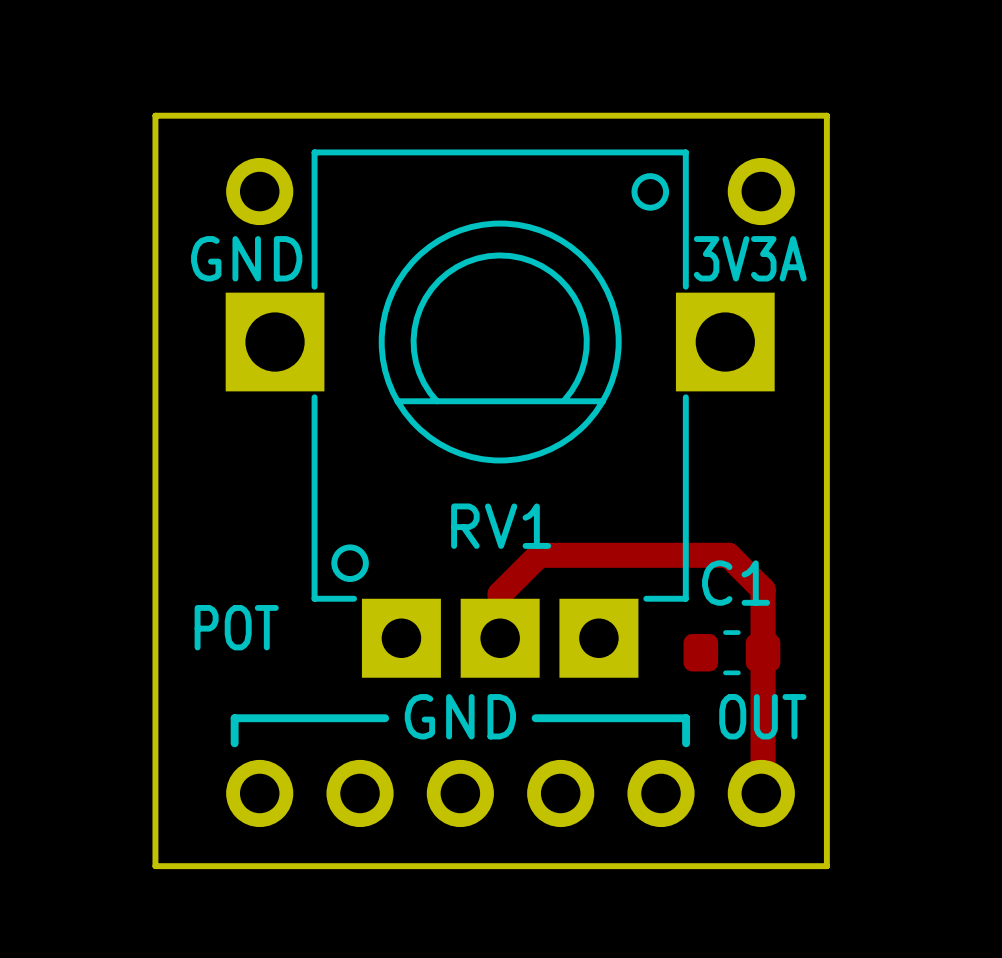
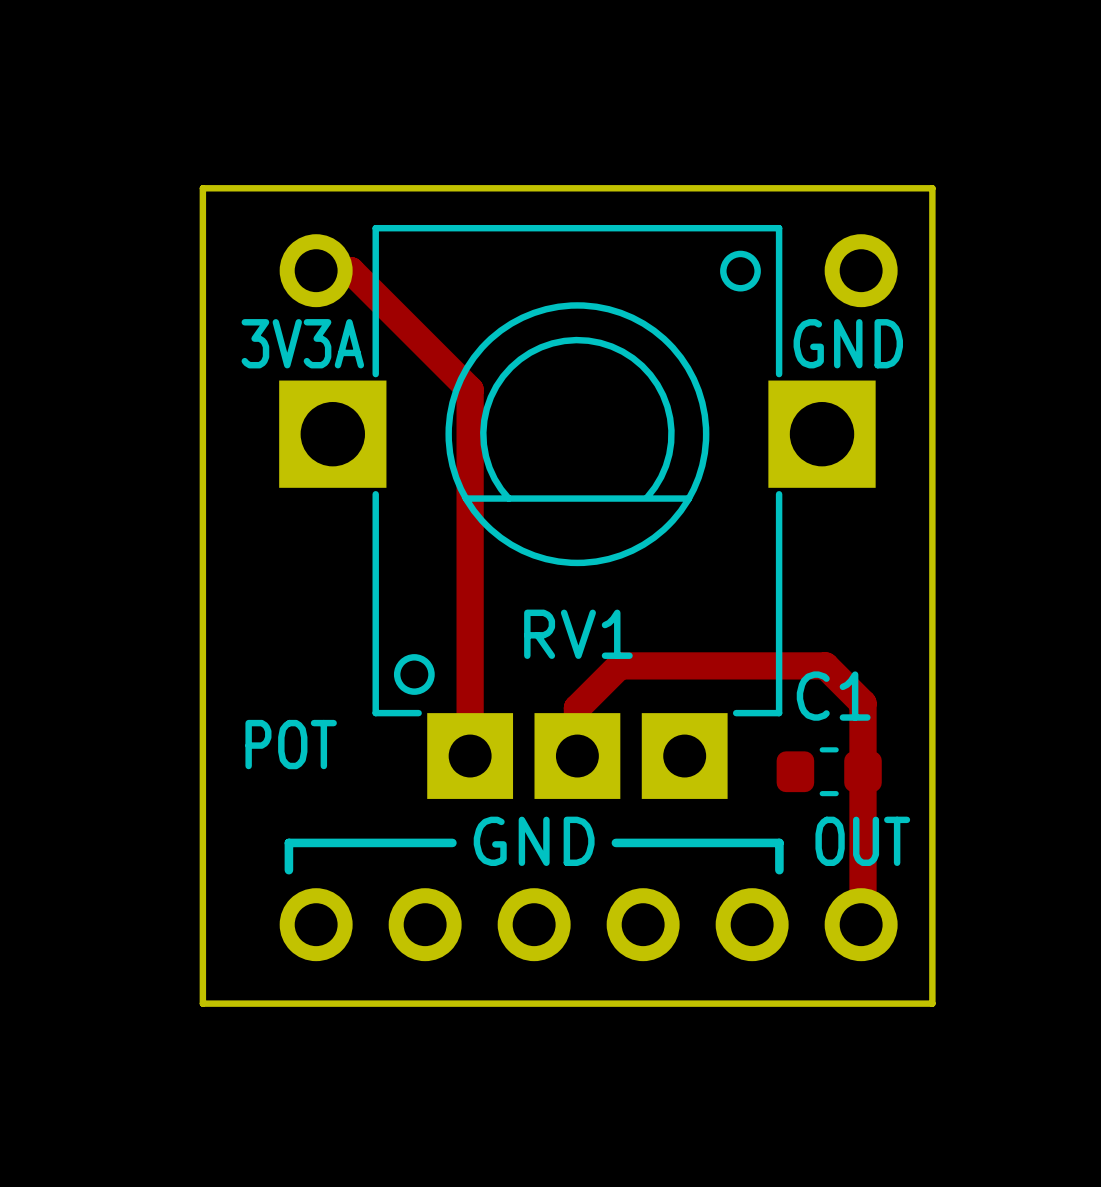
track: none -> (316, 270) (350, 270) (470, 389) (470, 756)
text: GND (246, 258) -> 3V3A (302, 343)
text: 3V3A (750, 258) -> GND (848, 343)

